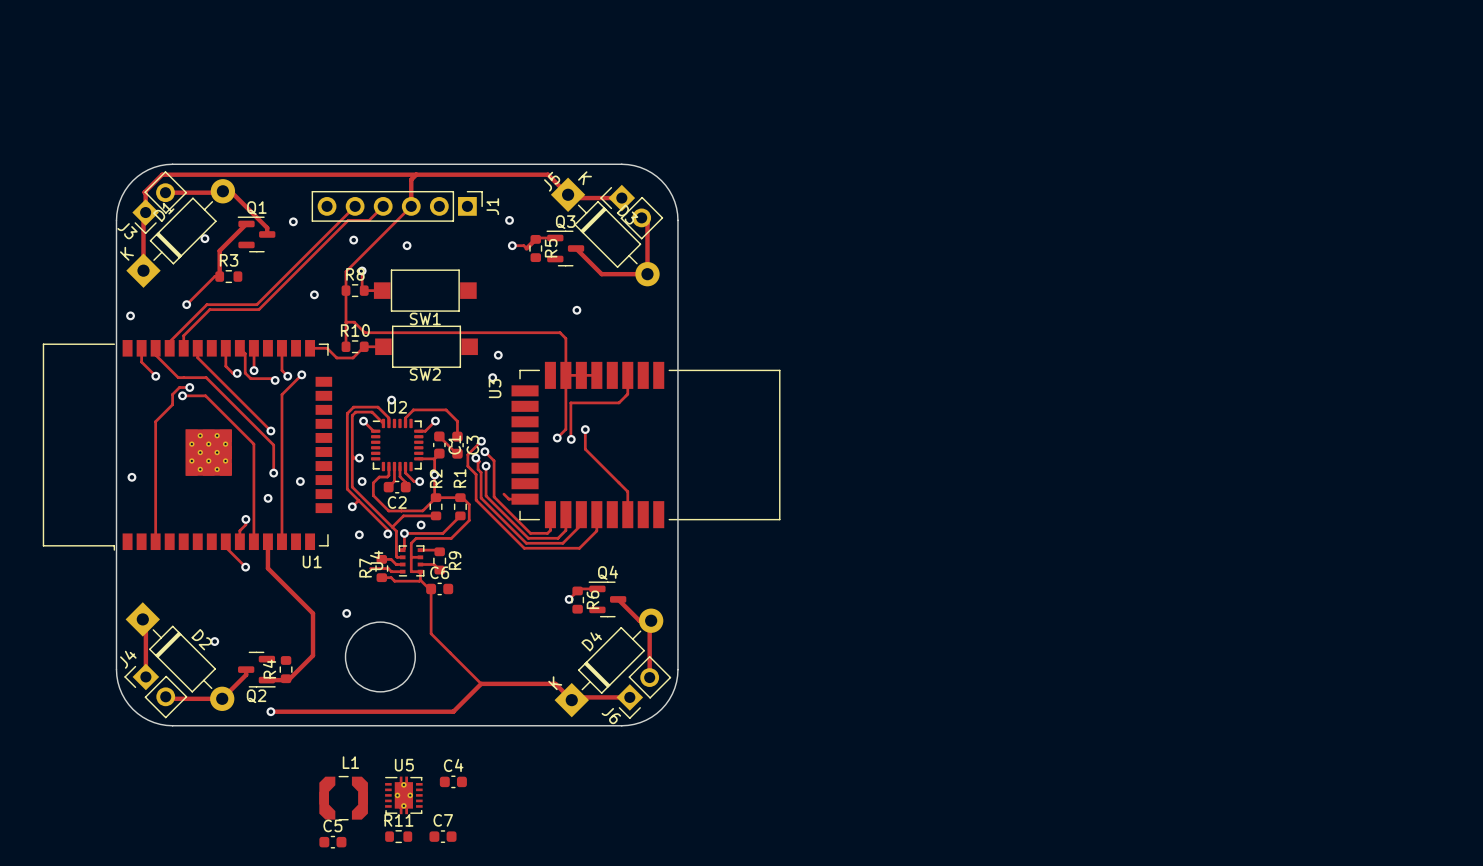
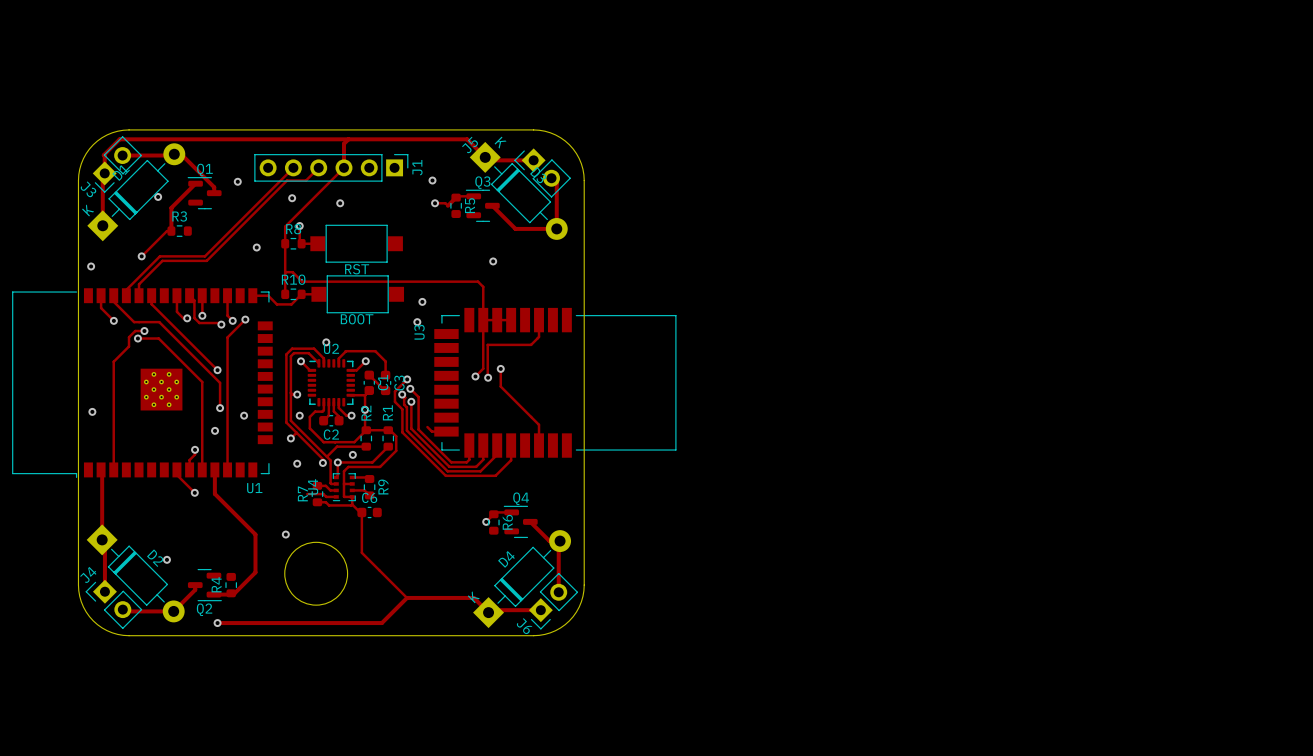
SW1 name: SW1 (425, 318) -> RST (357, 269)
SW2 name: SW2 (425, 374) -> BOOT (357, 319)
track: none -> (102, 471) (102, 539)
C4: (453, 781) -> none
U5: (403, 795) -> none
L1: (343, 798) -> none
R11: (398, 836) -> none
C7: (442, 836) -> none
C5: (332, 842) -> none

